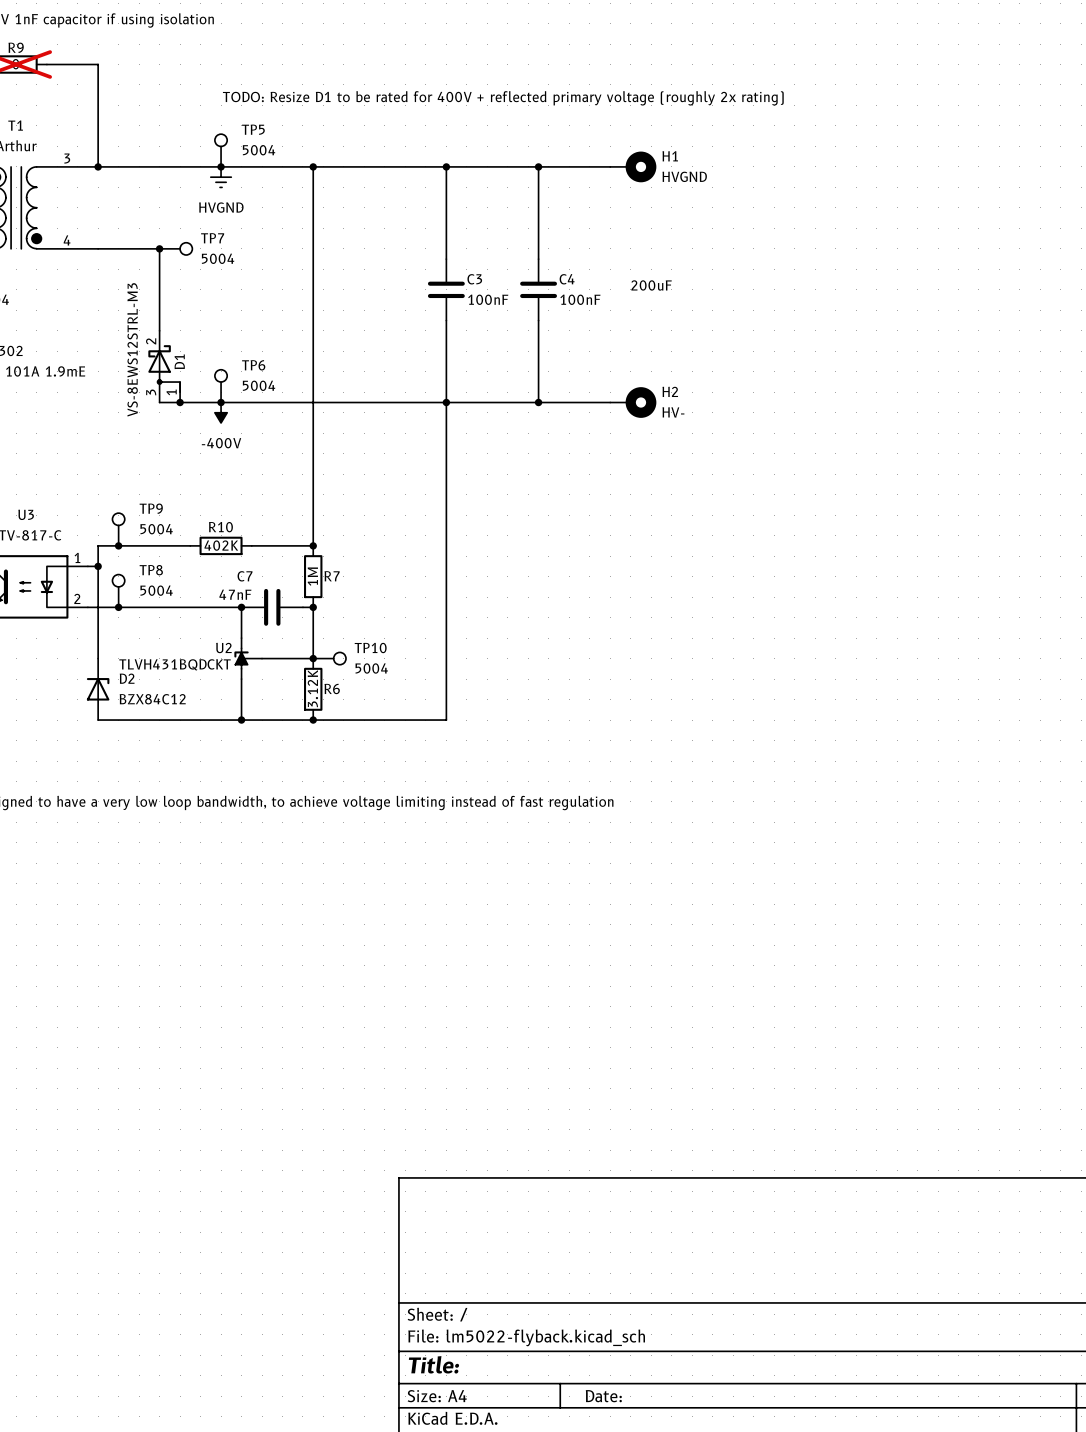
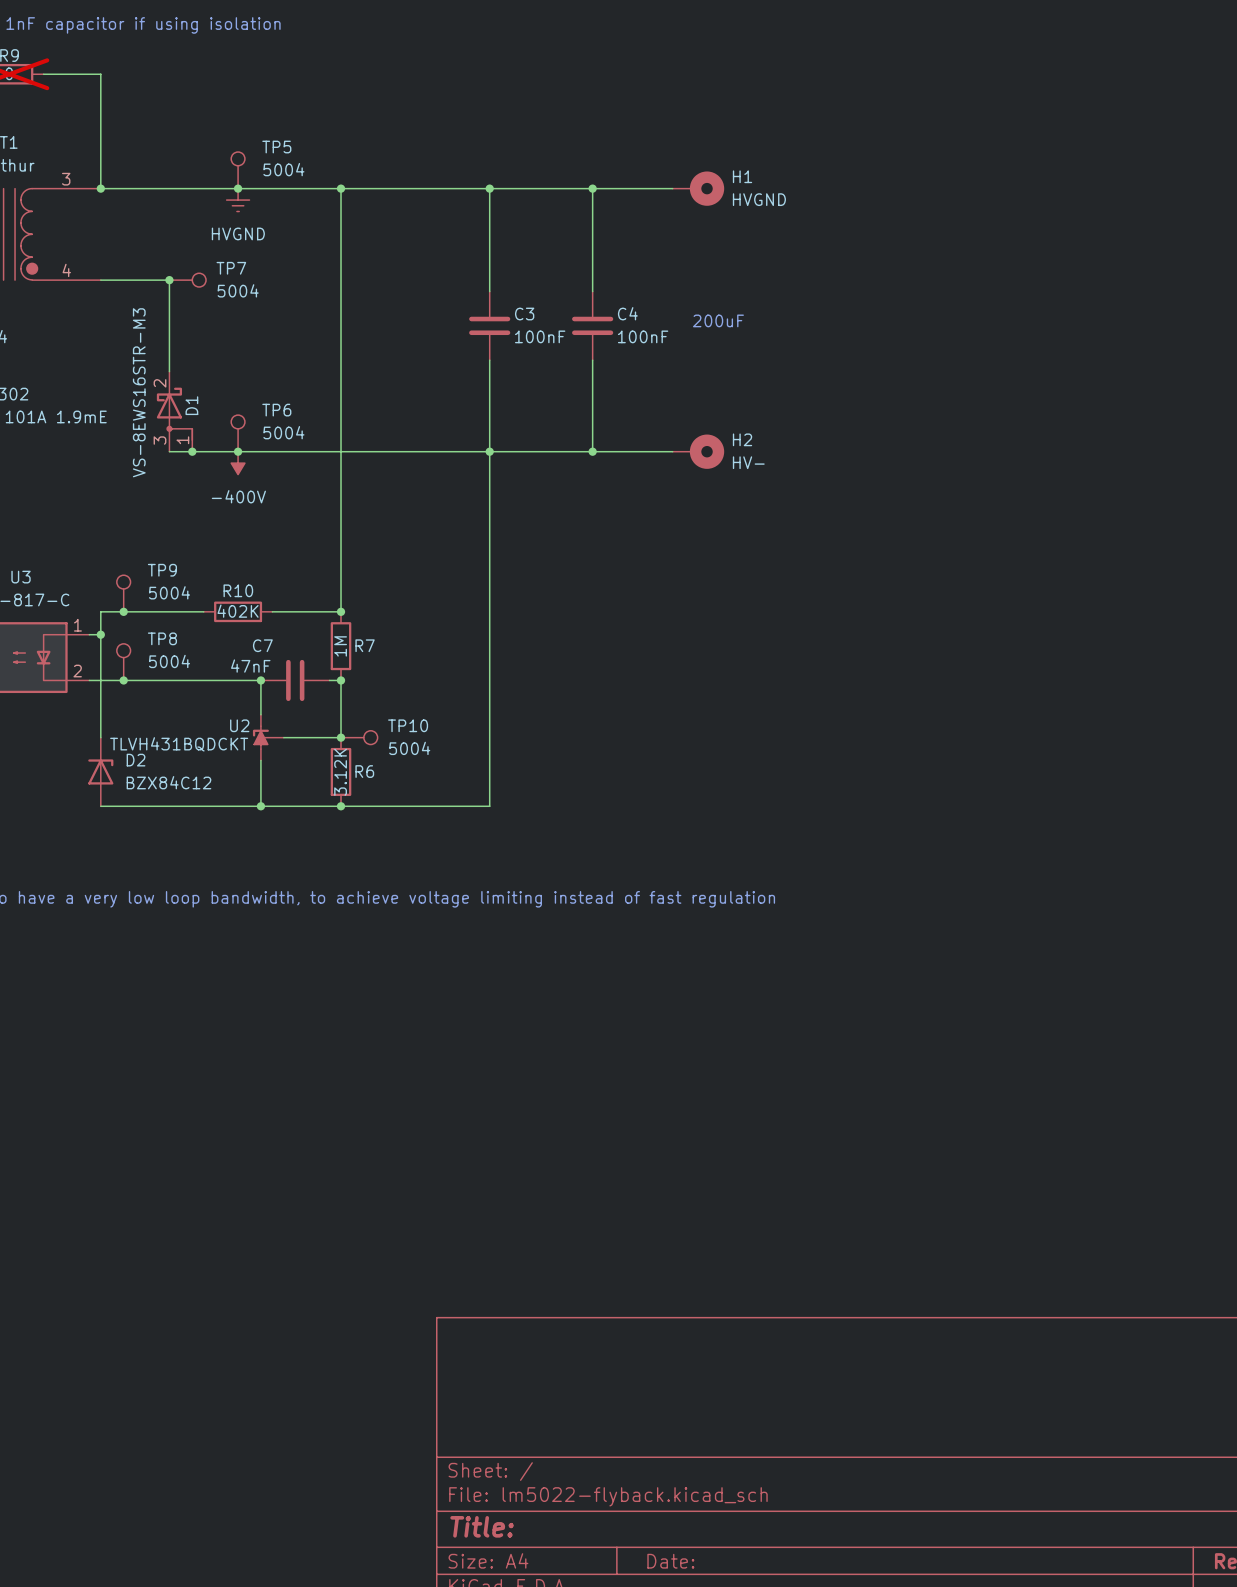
text: TODO: Resize D1 to be rated for 400V + reflected primary voltage (roughly 2x rating) (503, 98) -> none
D1 value: VS-8EWS12STRL-M3 (132, 349) -> VS-8EWS16STR-M3 (139, 392)

